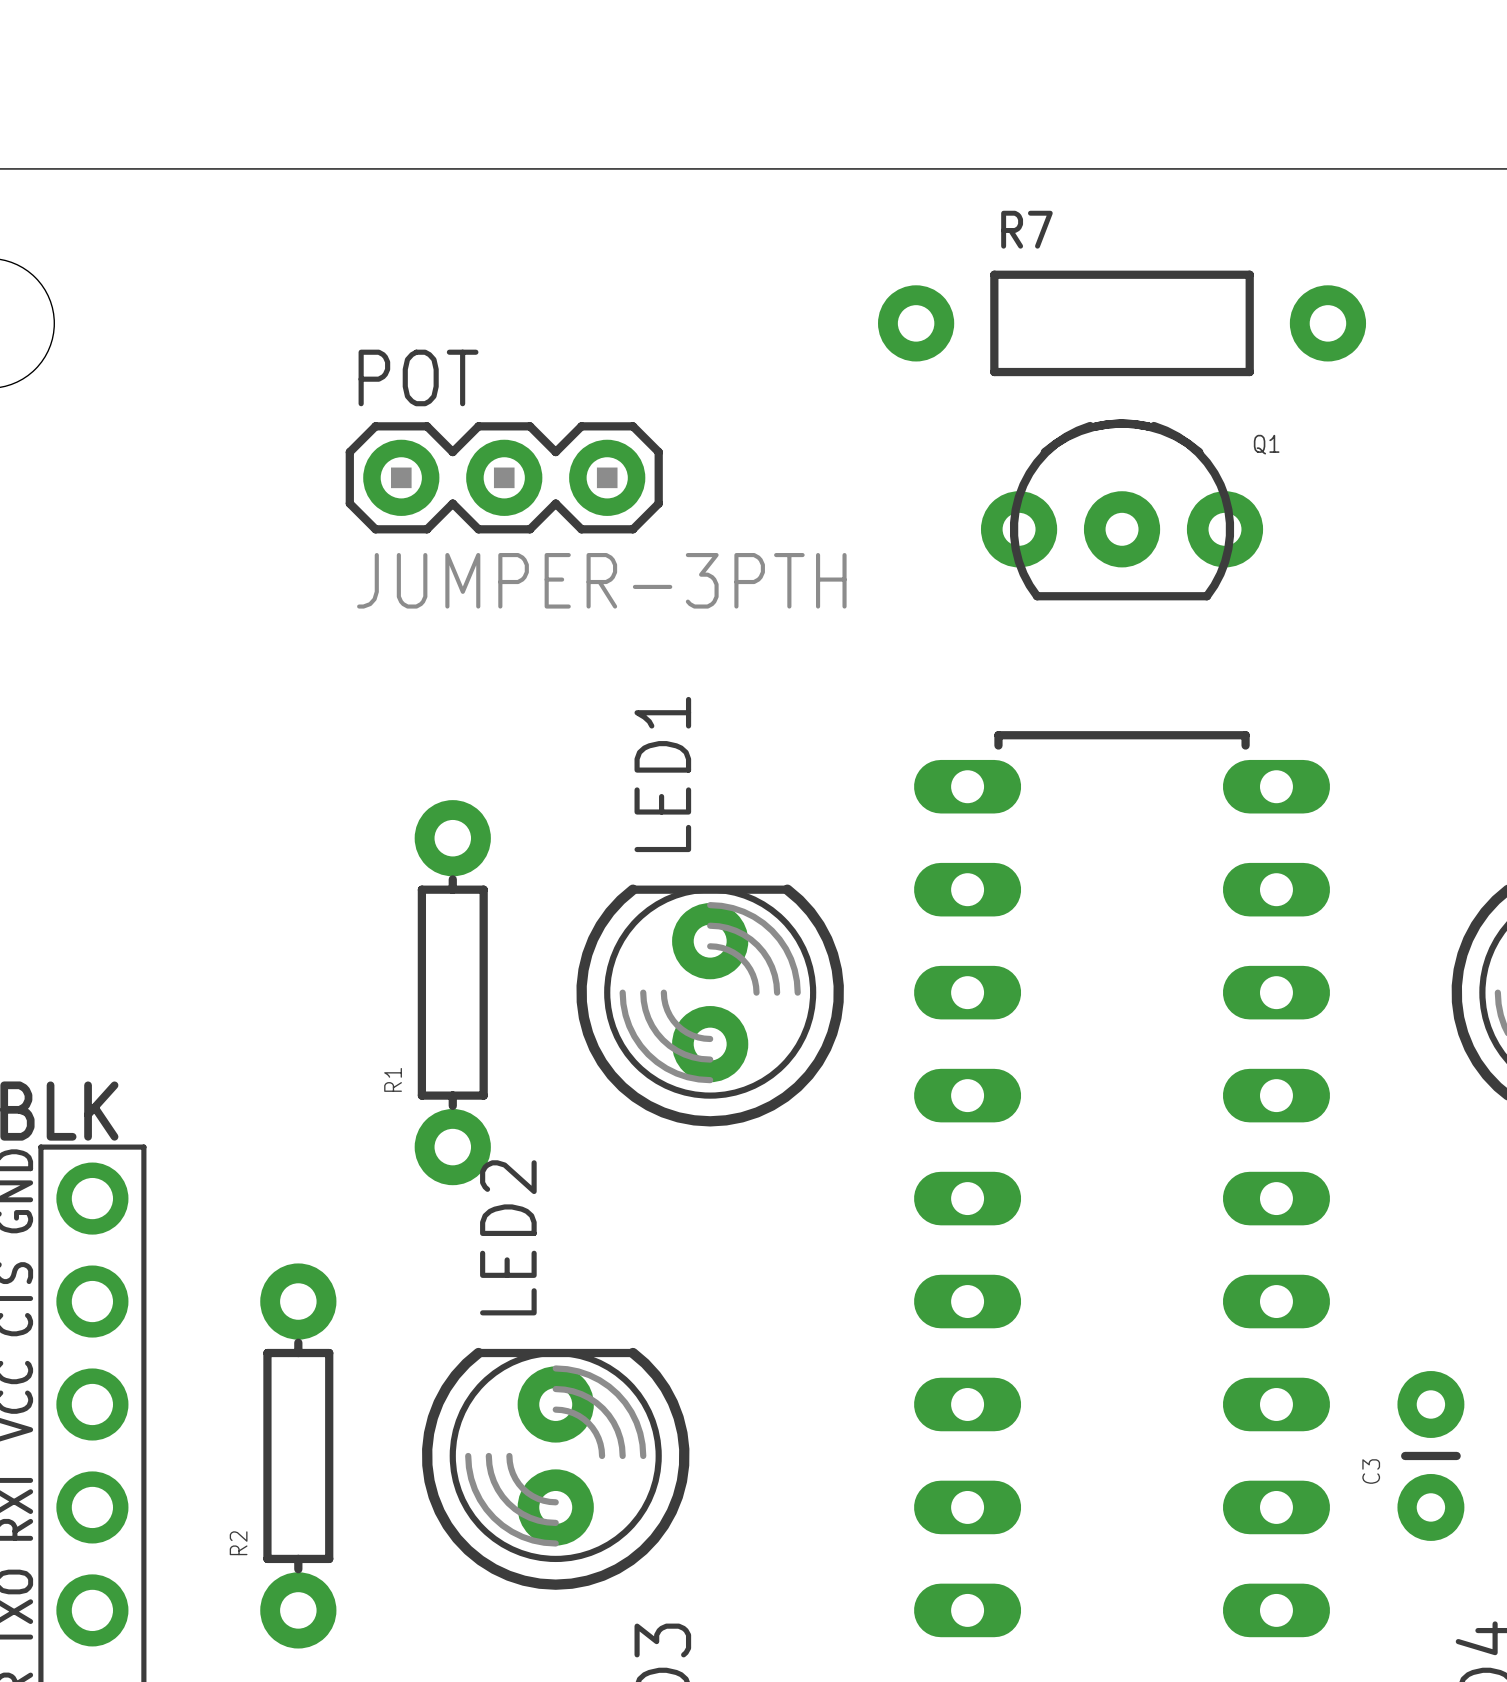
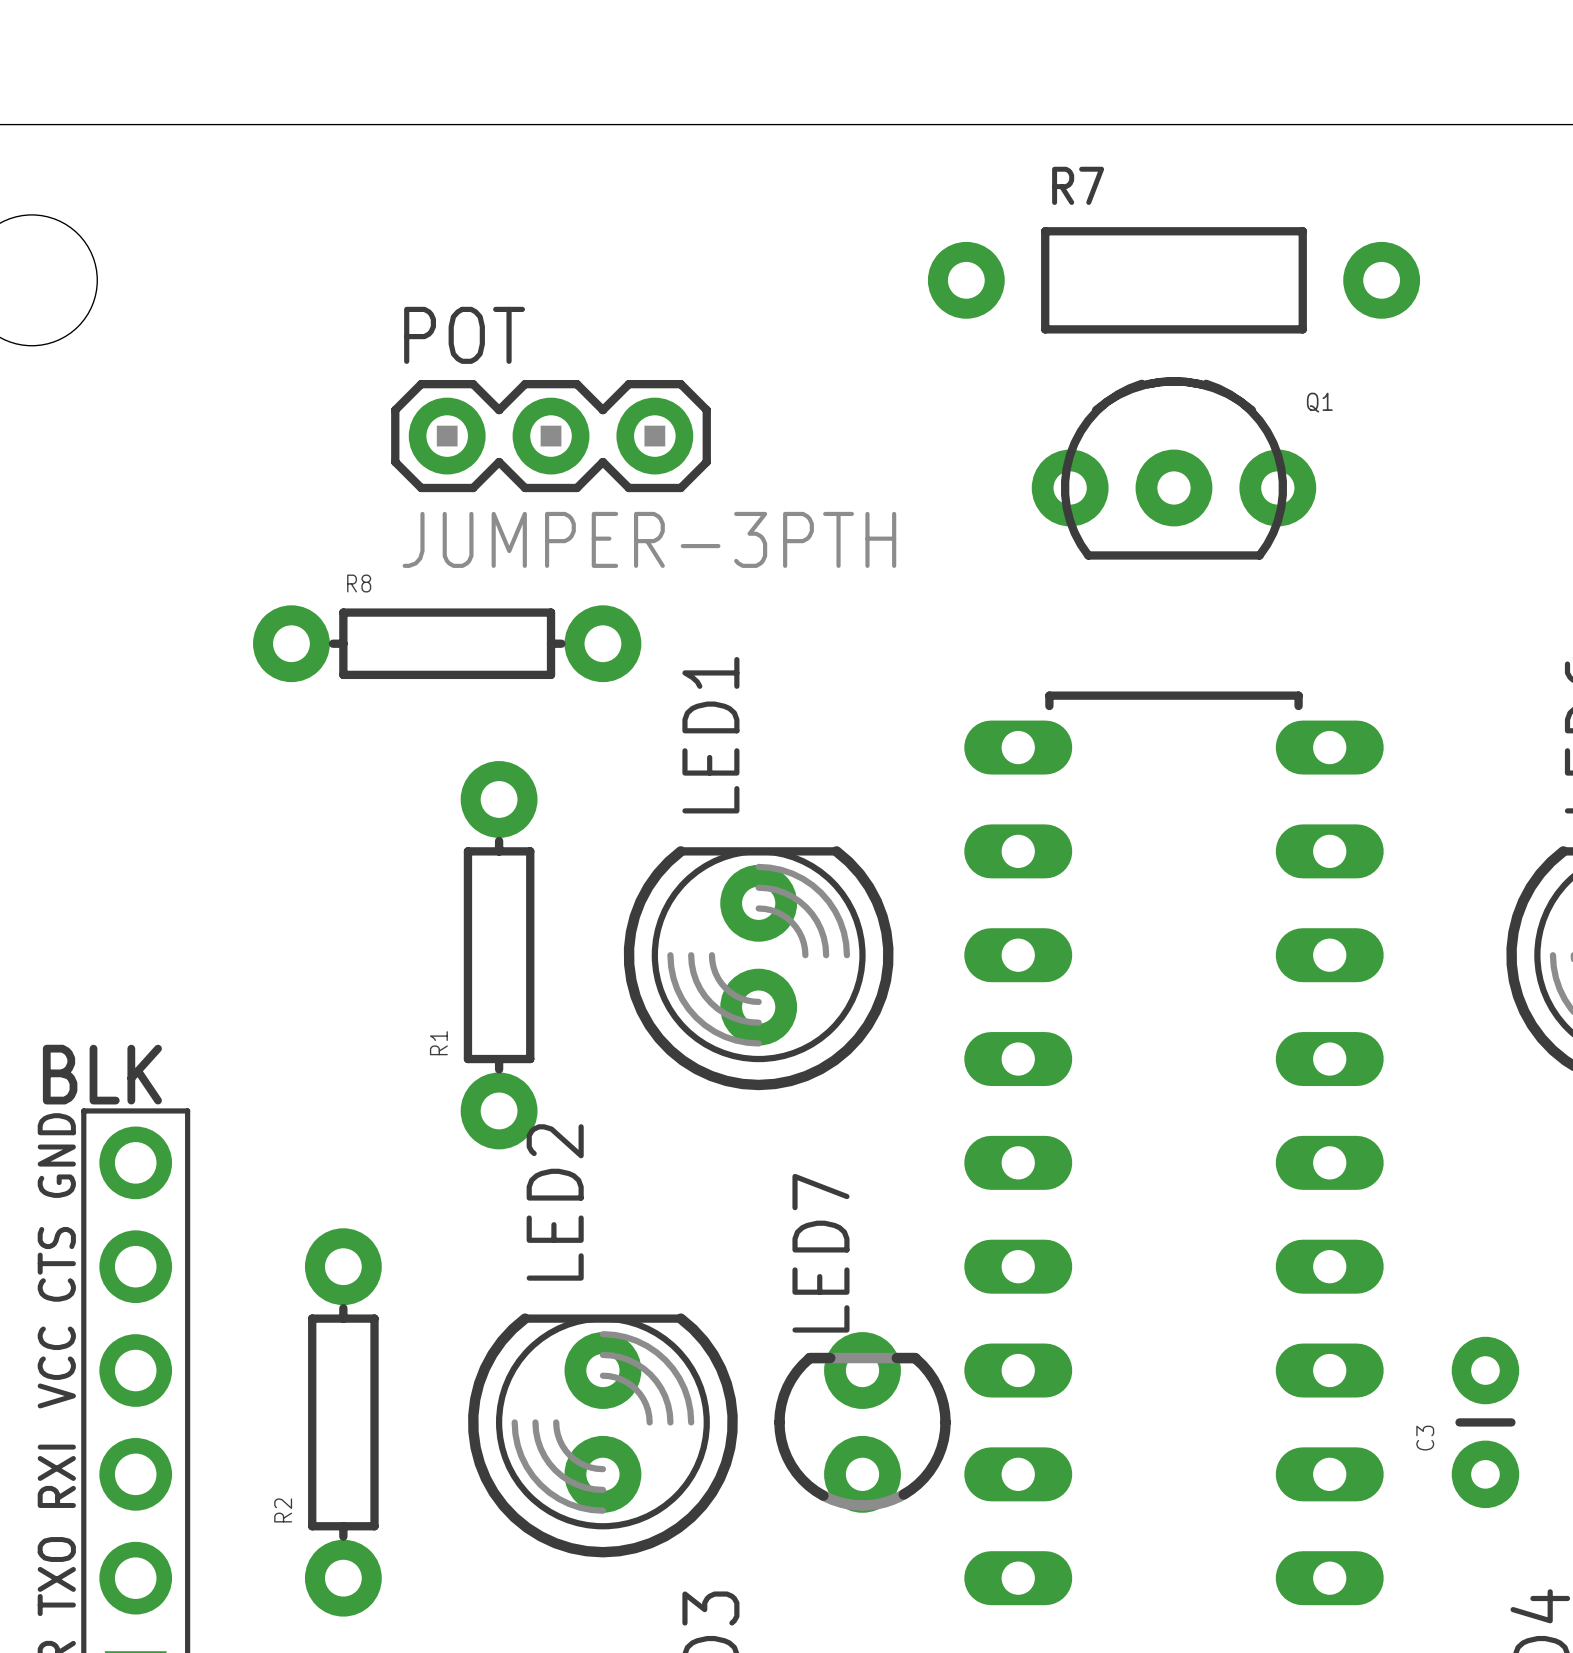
R8: none -> (447, 643)
LED7: none -> (862, 1422)

